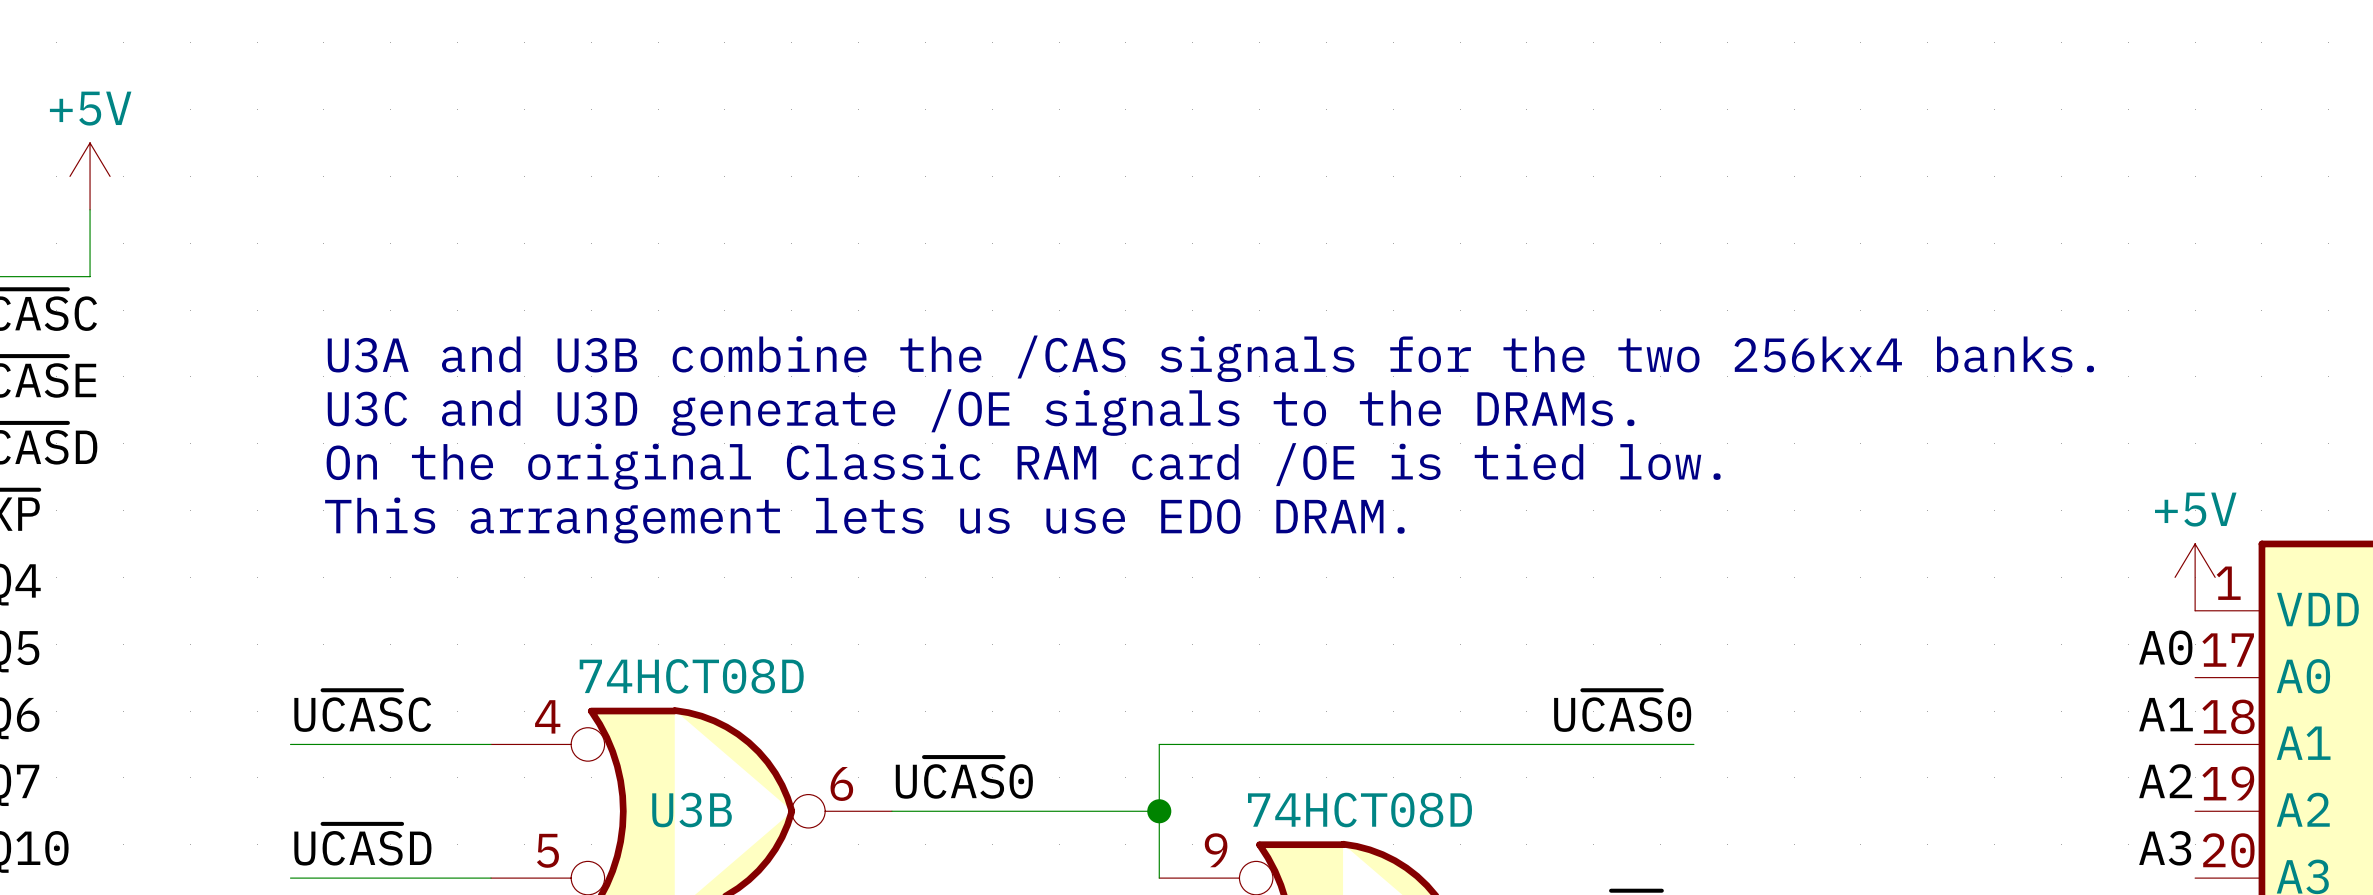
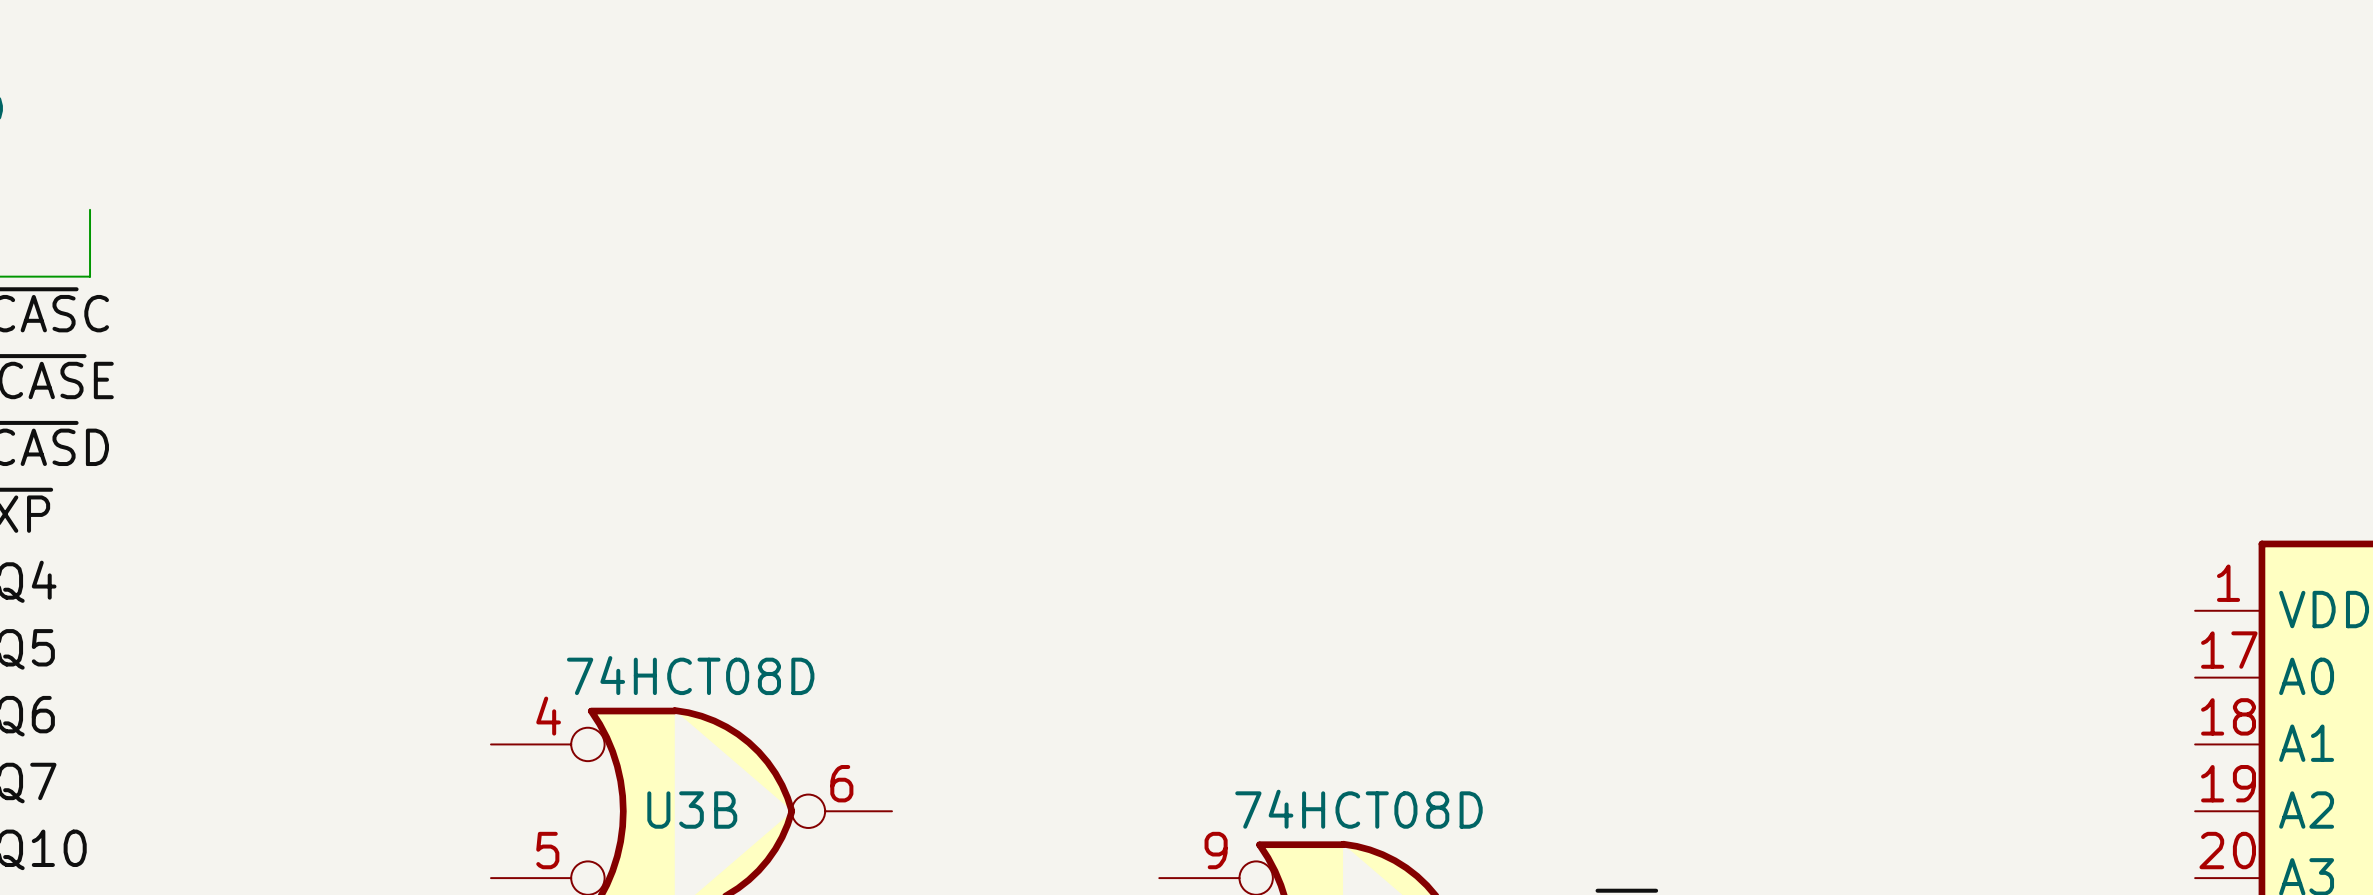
power symbol: +5V (90, 176) -> none
text: U3A and U3B combine the /CAS signals for the two 256kx4 banks. (1210, 358) -> none
text: U3C and U3D generate /OE signals to the DRAMs. (981, 412) -> none
text: On the original Classic RAM card /OE is tied low. (1023, 466) -> none
text: This arrangement lets us use EDO DRAM. (864, 520) -> none
power symbol: +5V (2195, 577) -> none
label: A0 (2165, 647) -> none
label: U~{CAS}C (362, 711) -> none
label: U~{CAS}0 (1622, 711) -> none
label: A1 (2166, 714) -> none
wire: (290, 744) (491, 744) -> none
wire: (1693, 744) (1159, 744) (1159, 878) -> none
label: U~{CAS}0 (964, 777) -> none
label: A2 (2165, 781) -> none
wire: (891, 811) (1159, 811) -> none
junction: (1159, 811) -> none
label: U~{CAS}D (362, 844) -> none
label: A3 (2165, 848) -> none
wire: (290, 878) (491, 878) -> none

